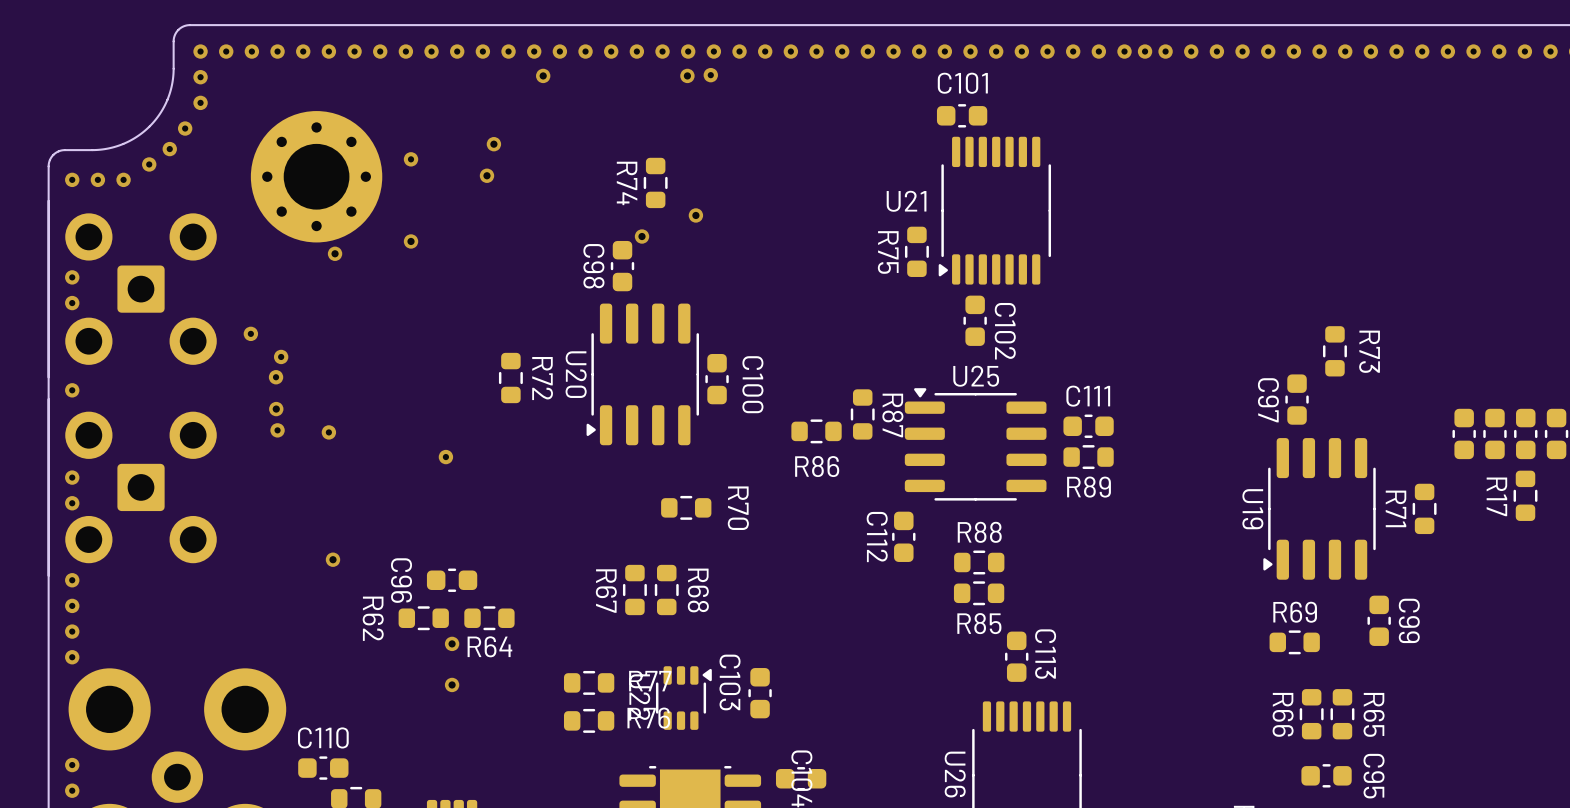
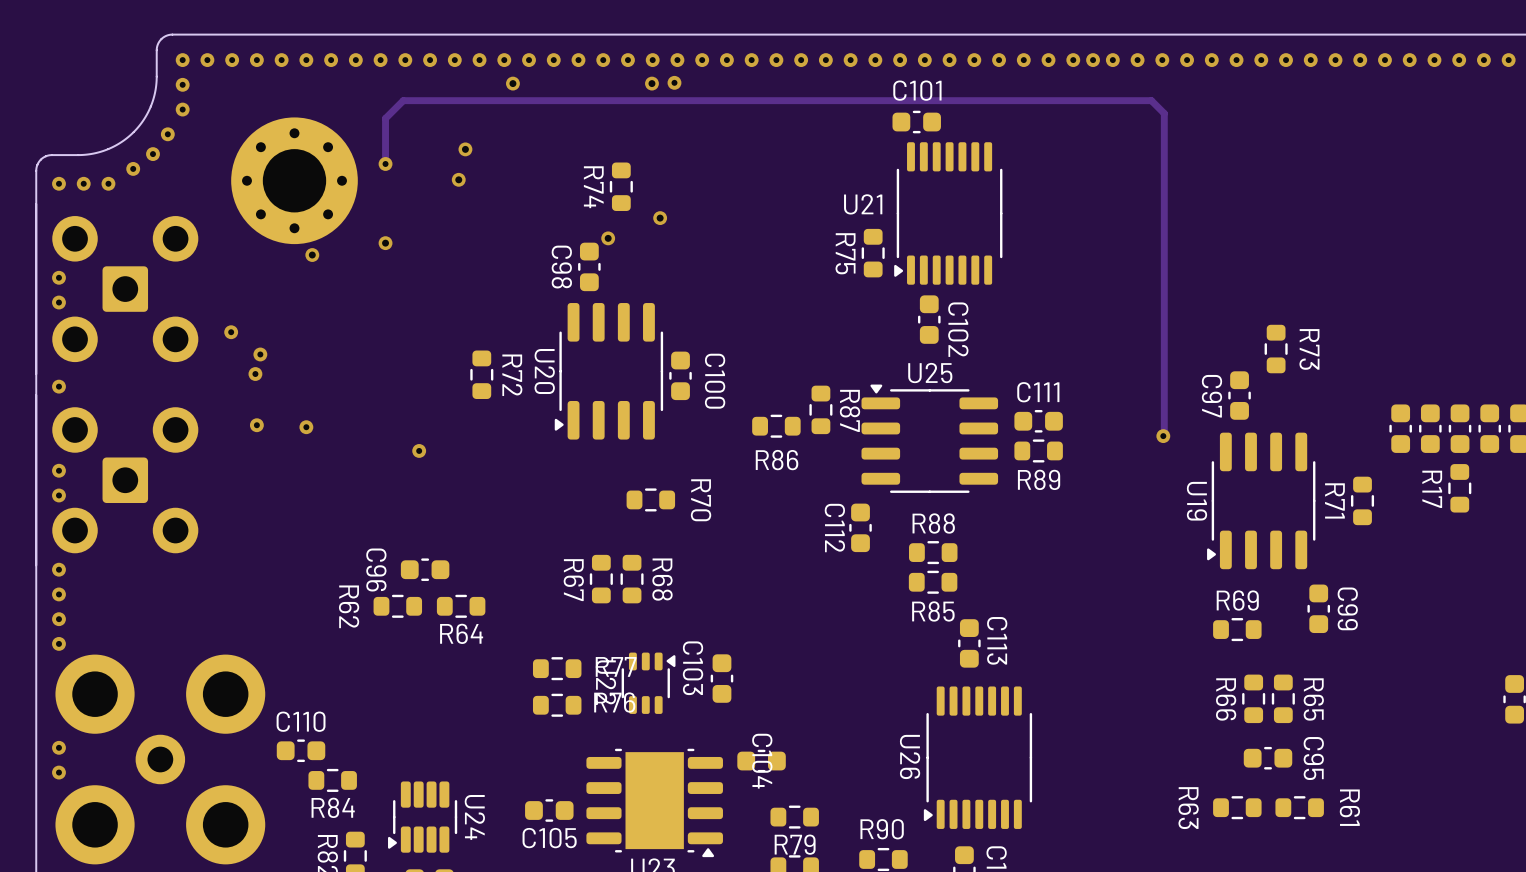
track: none -> (385, 163) (385, 118) (403, 100) (1151, 100) (1164, 113) (1163, 436)
via: (276, 409) -> none
via: none -> (1163, 436)
via: (332, 559) -> none
via: (452, 643) -> none
via: (452, 684) -> none

